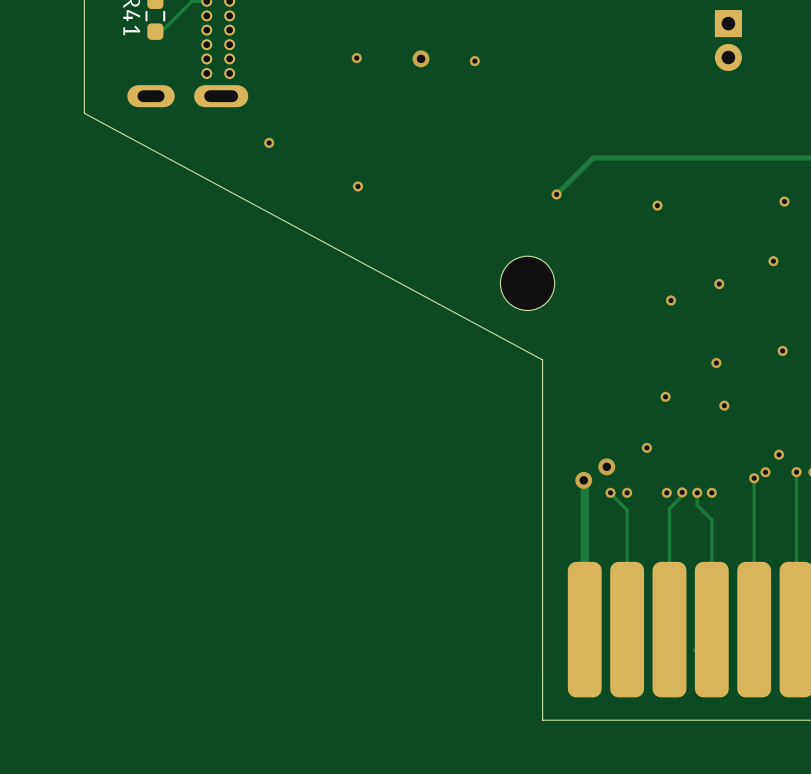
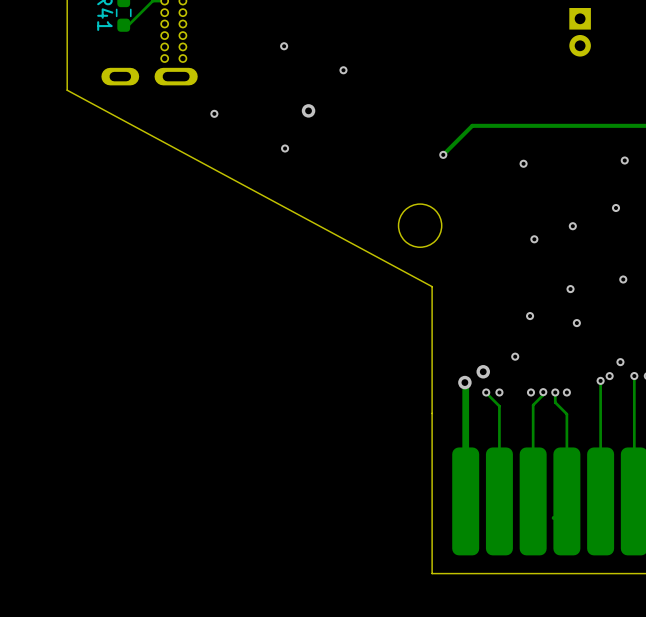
via position: (421, 58) -> (308, 110)
via position: (474, 61) -> (343, 70)

